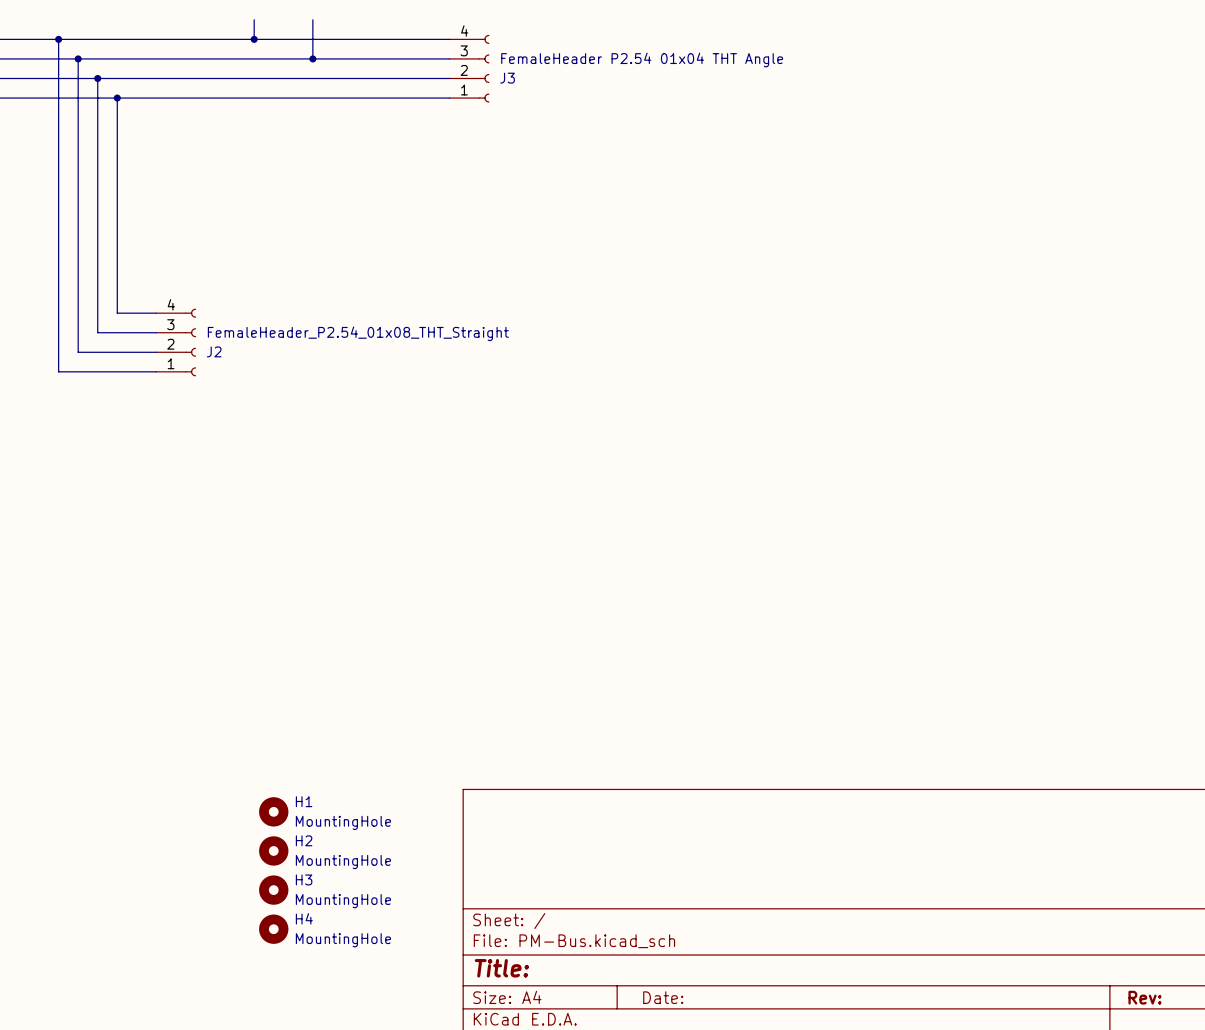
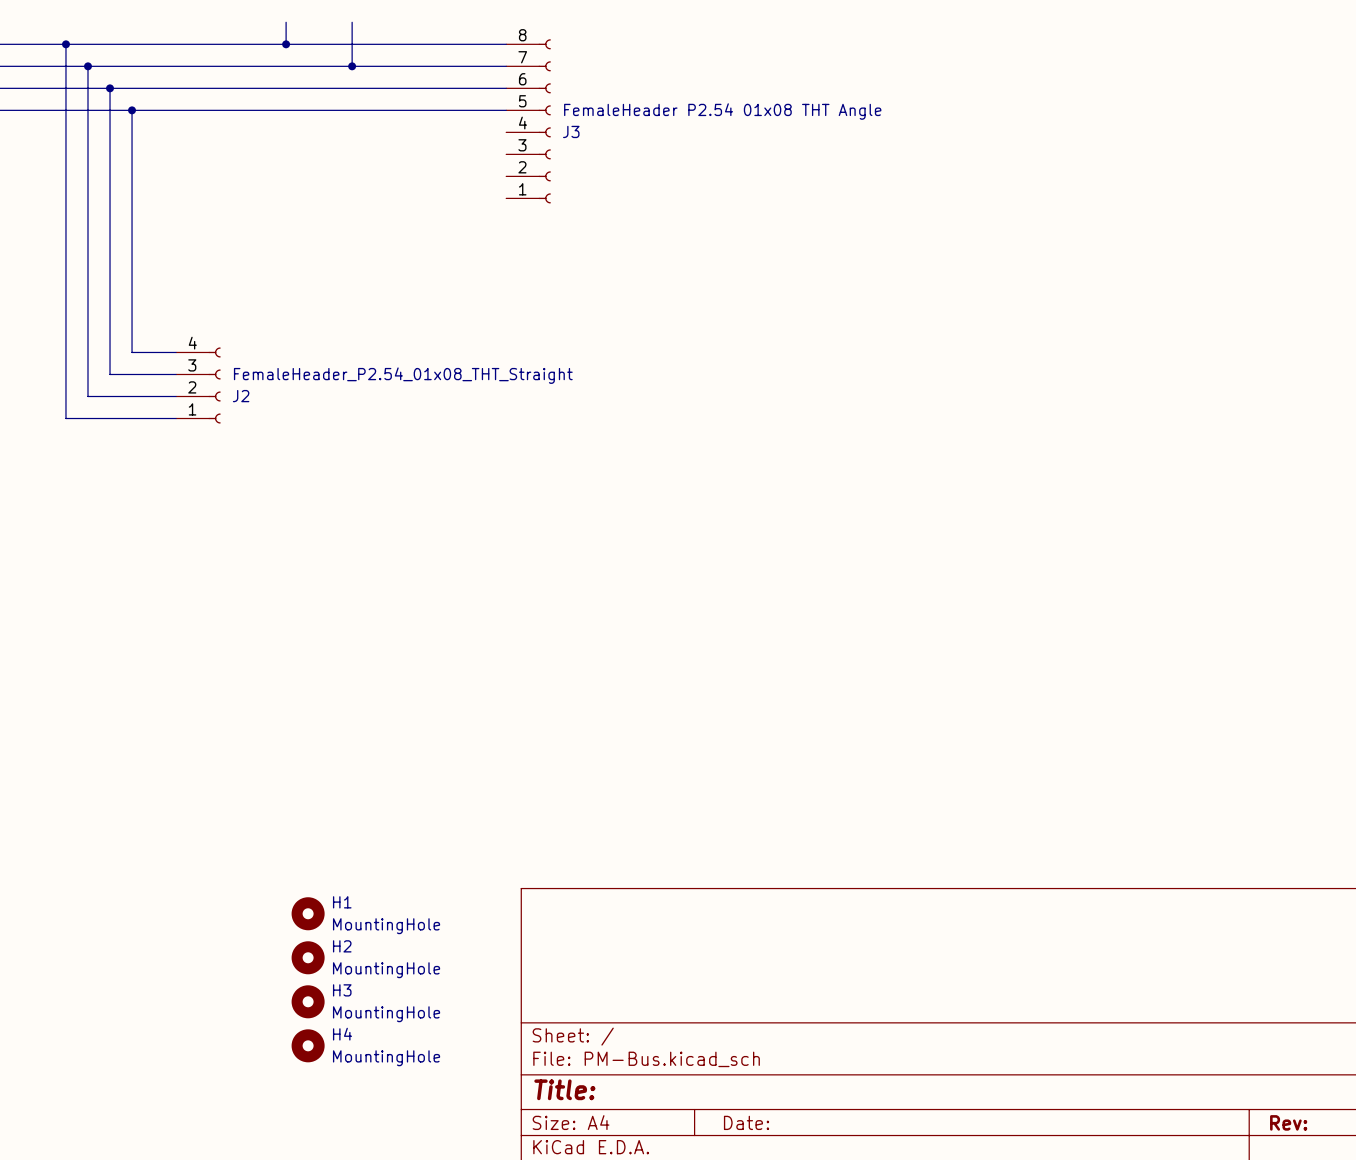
J3 symbol: [449, 34, 490, 103] -> [506, 39, 551, 204]
J3 value: FemaleHeader P2.54 01x04 THT Angle (642, 59) -> FemaleHeader P2.54 01x08 THT Angle (722, 111)

